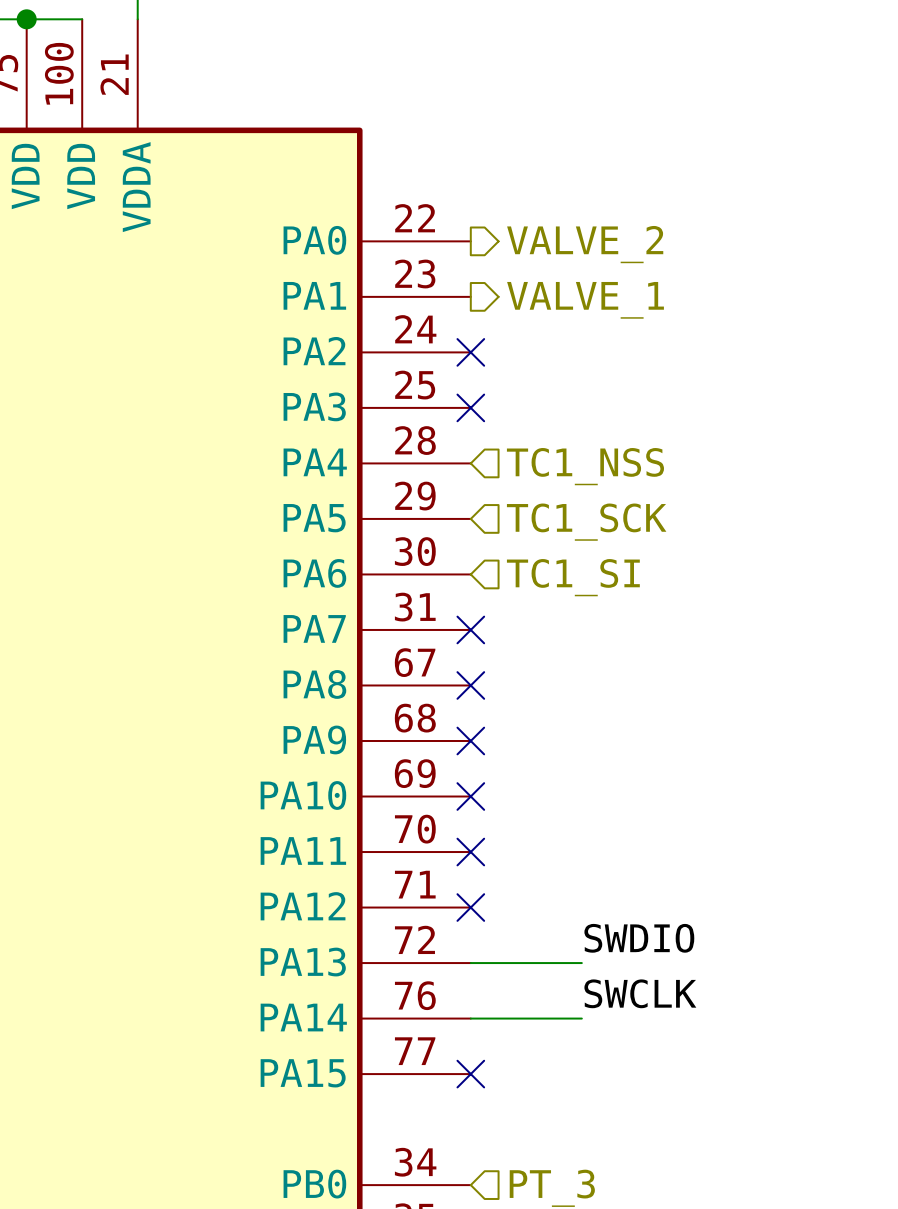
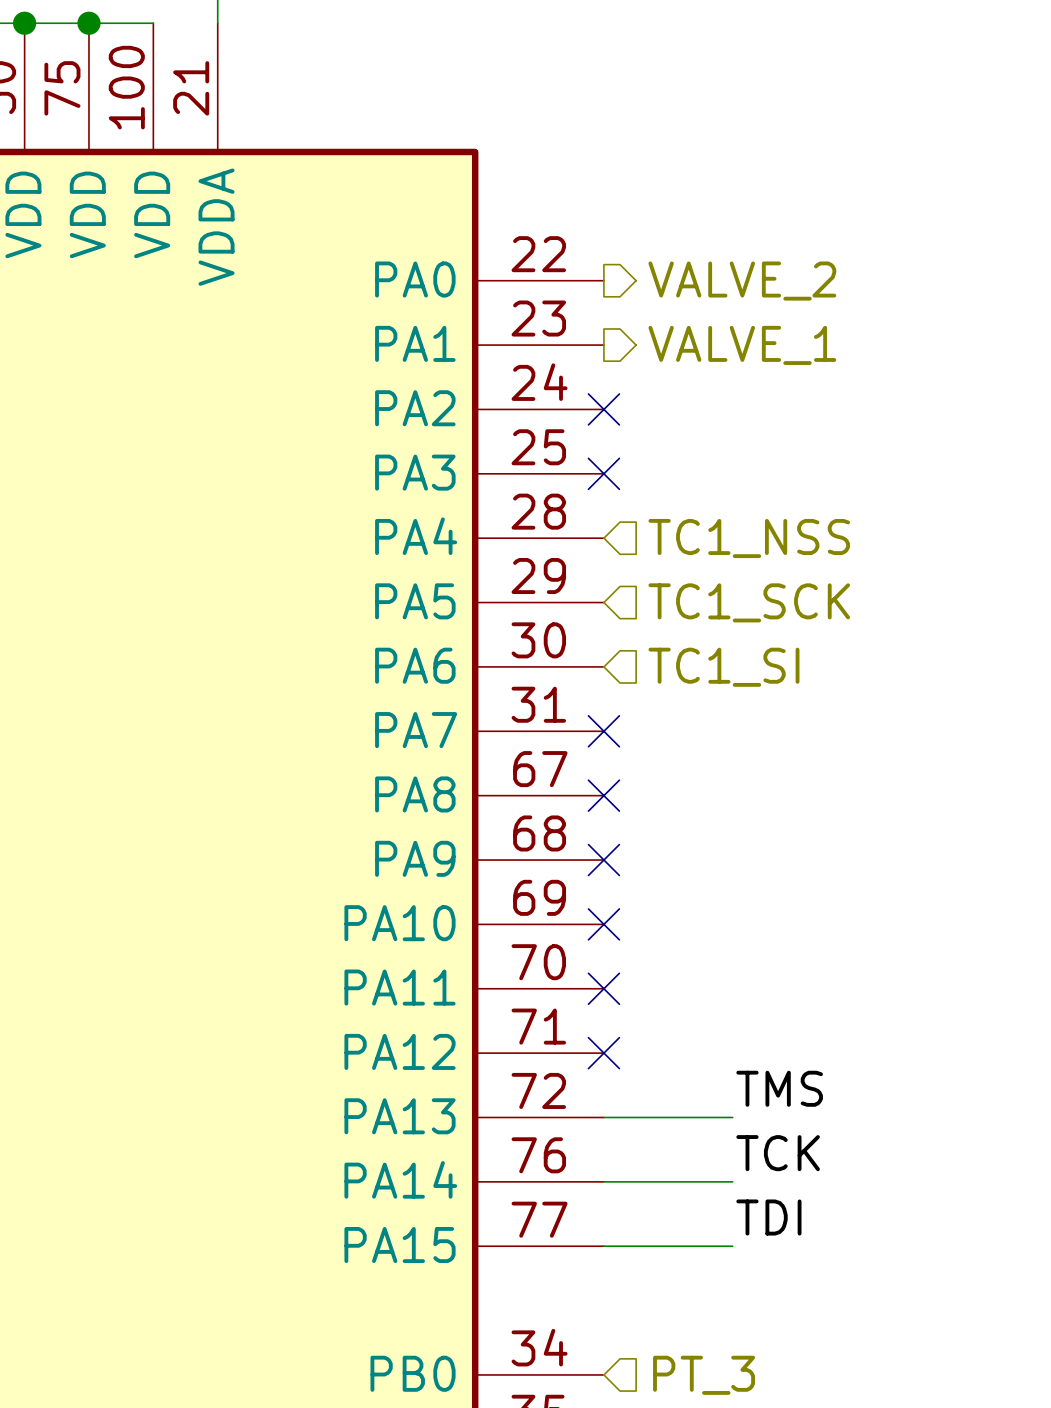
label: SWDIO (639, 938) -> TMS (779, 1088)
label: SWCLK (640, 993) -> TCK (778, 1153)
label: none -> TDI (768, 1217)
wire: none -> (603, 1246) (732, 1246)
no-connect mark: (470, 1074) -> none

